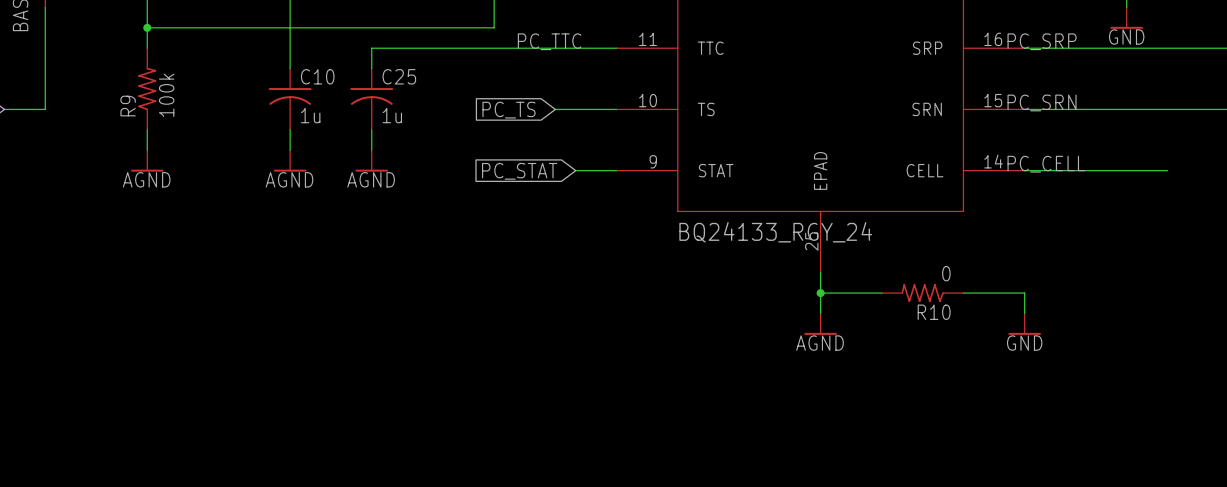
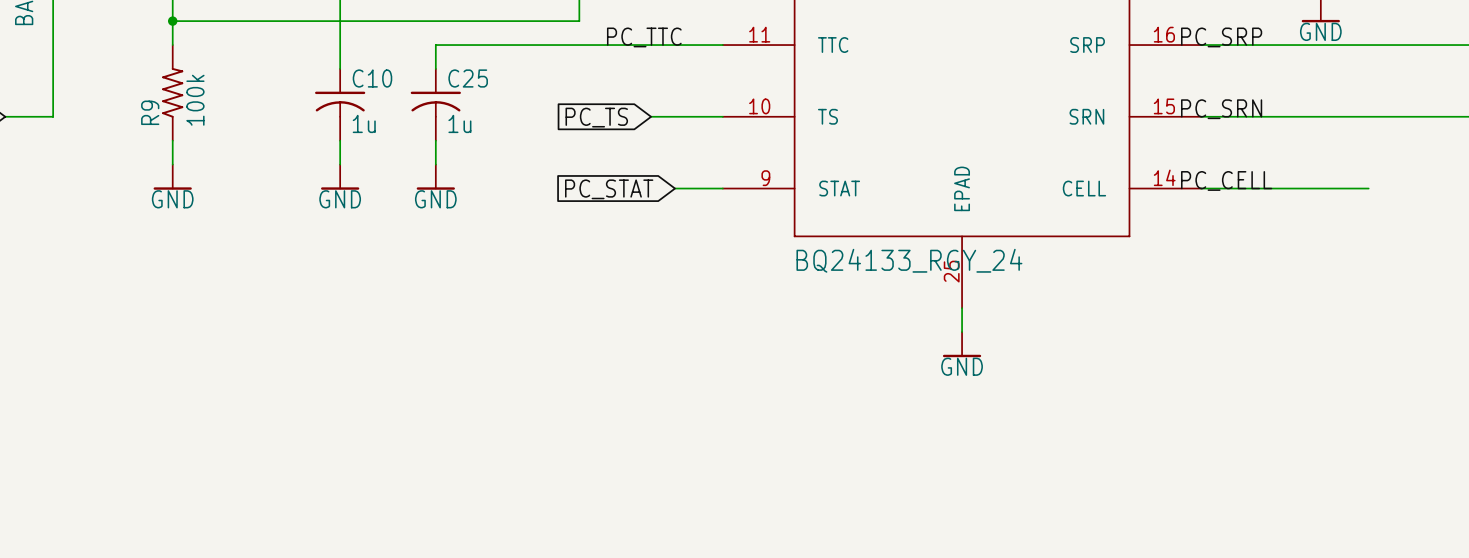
power symbol: AGND (147, 160) -> GND (172, 177)
power symbol: AGND (290, 160) -> GND (340, 177)
power symbol: AGND (371, 160) -> GND (435, 177)
junction: (820, 293) -> none
wire: (881, 293) (820, 293) (820, 313) -> none
R10: 0 (922, 293) -> none
wire: (963, 293) (1024, 293) (1024, 313) -> none
power symbol: none -> GND (962, 344)
power symbol: AGND (820, 324) -> none
power symbol: GND (1024, 324) -> none

